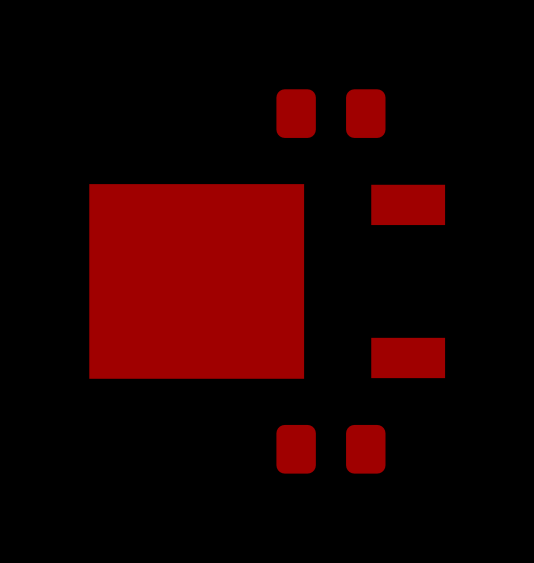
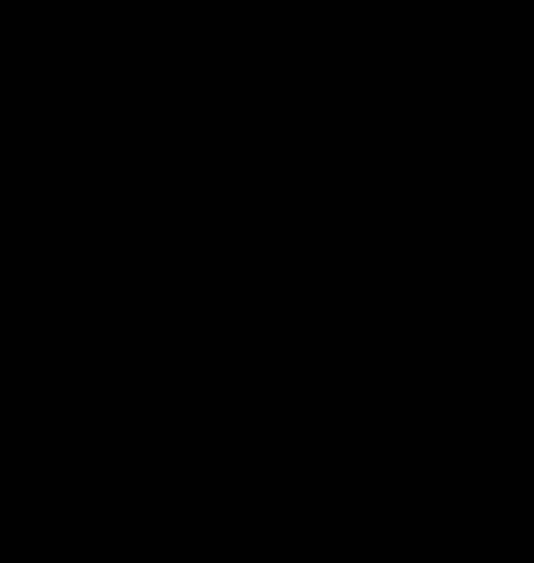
part: (330, 113) -> none
part: (267, 281) -> none
part: (330, 449) -> none

